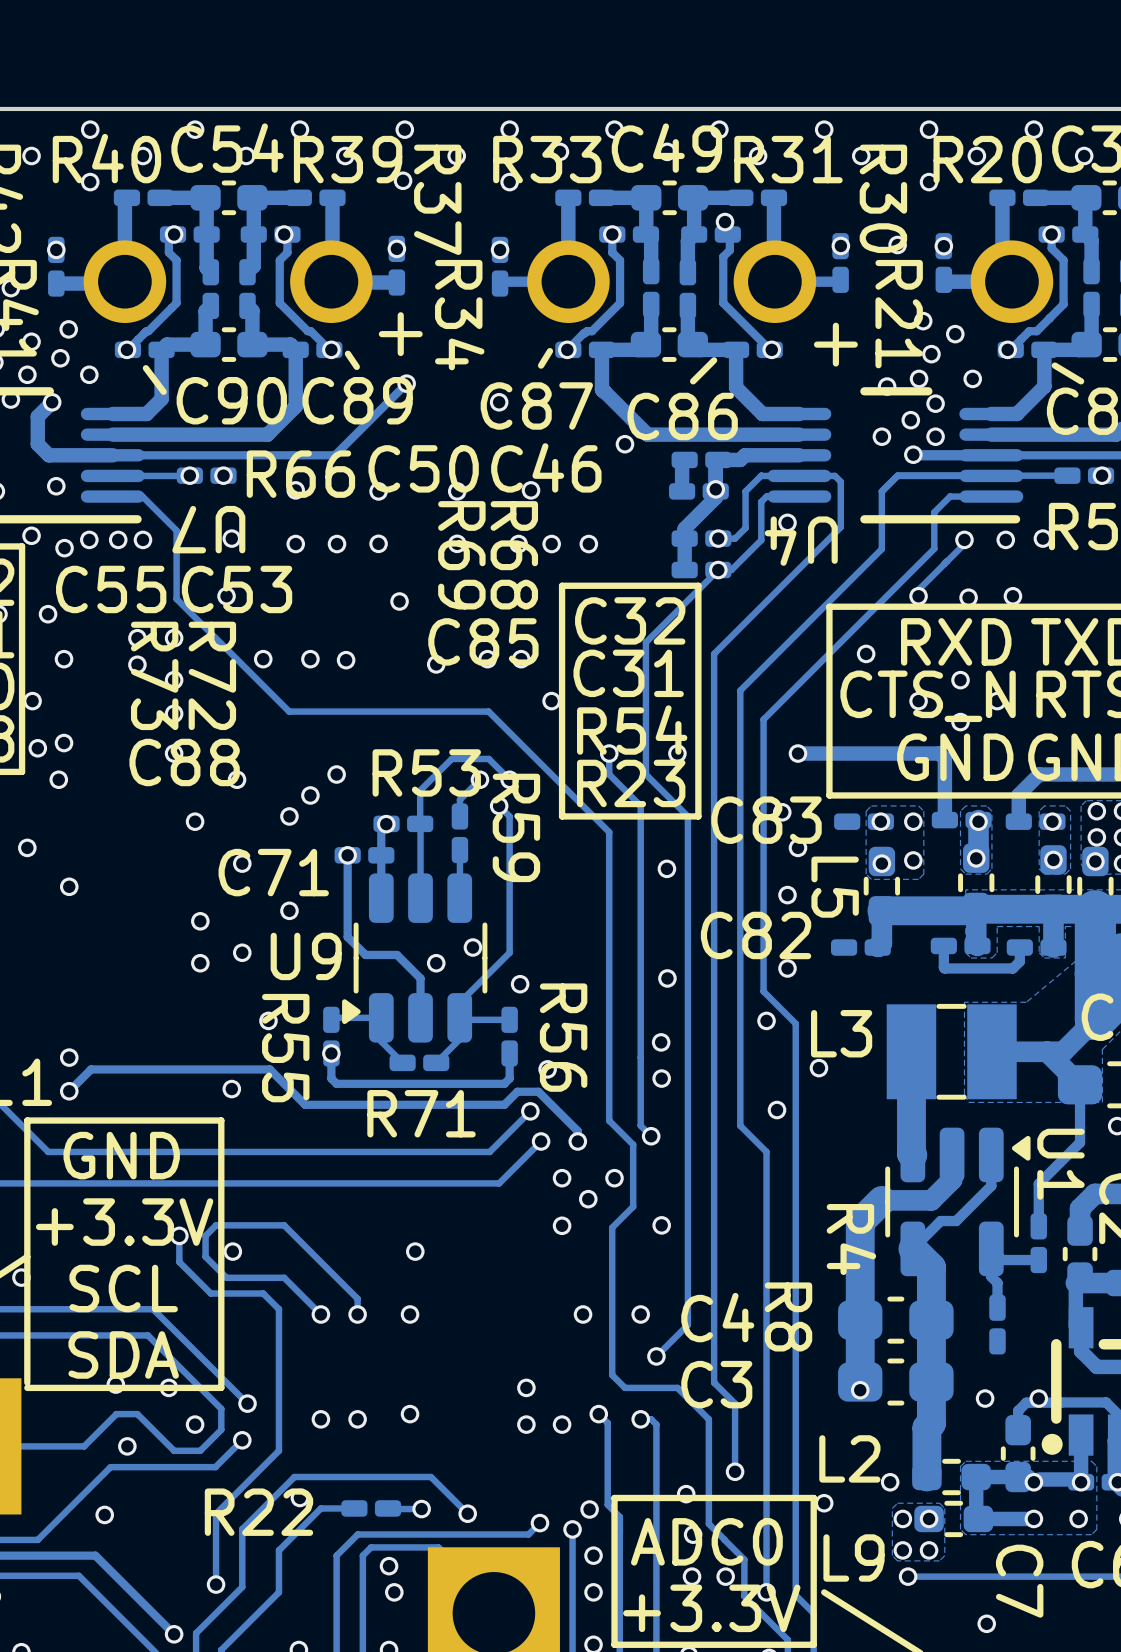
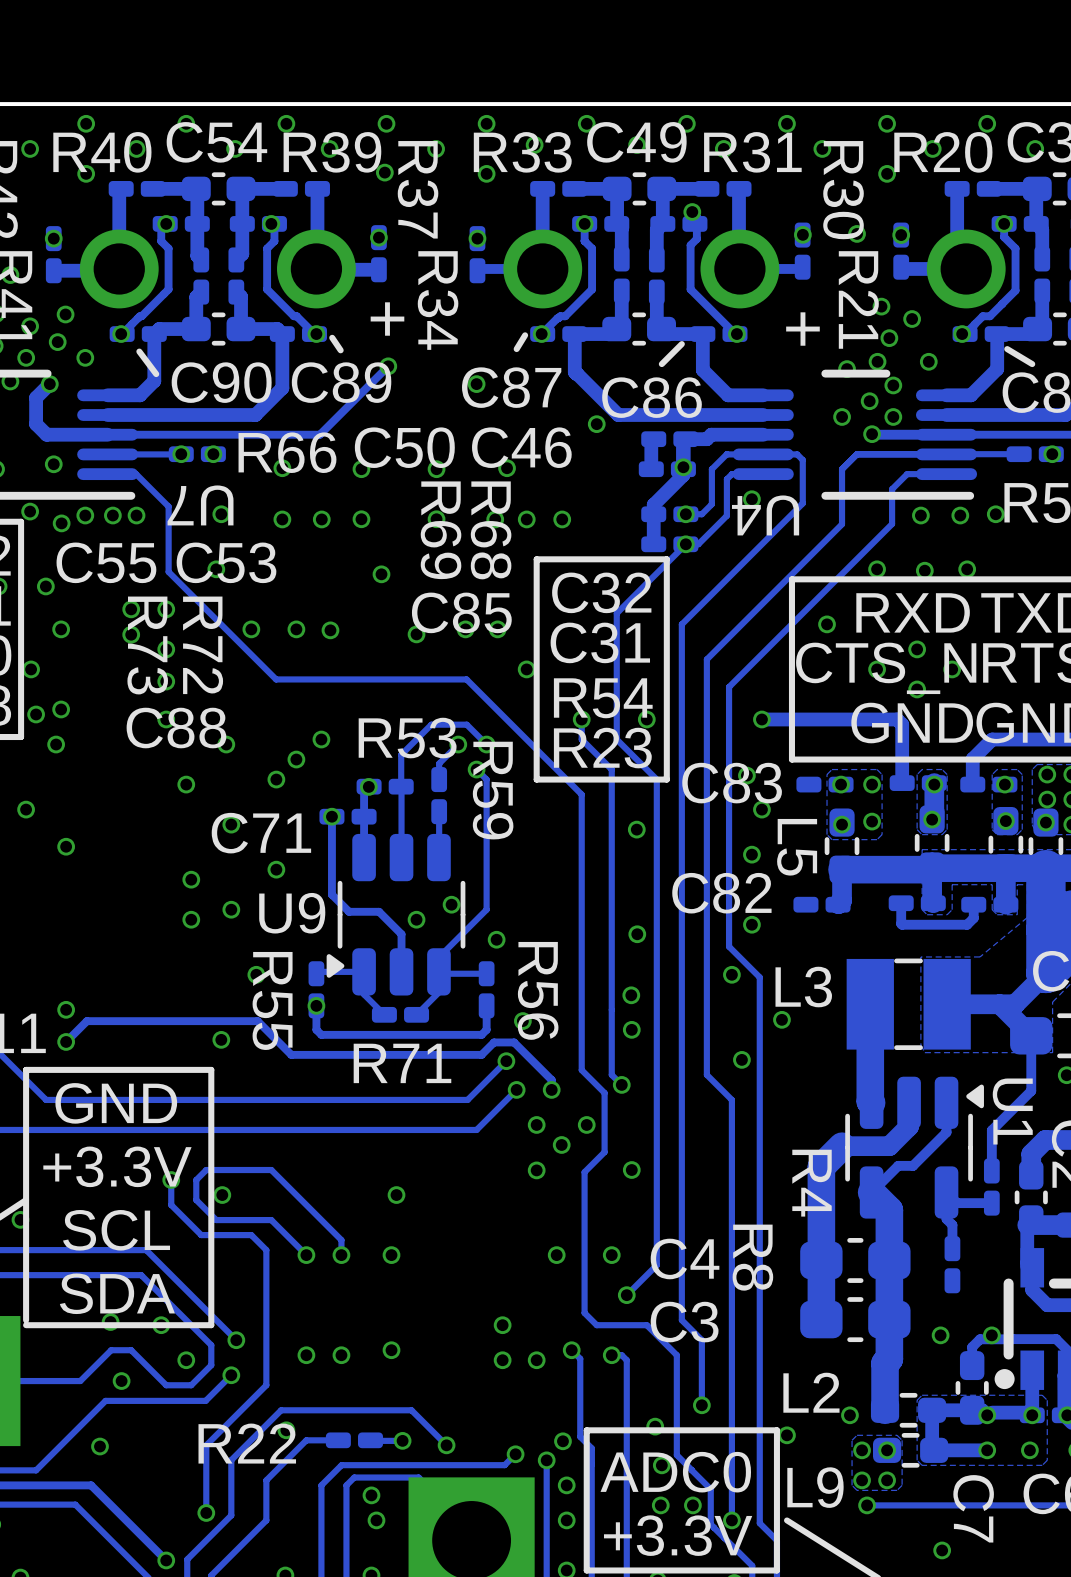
track: (964, 539) (964, 544) (947, 561) -> none
track: (944, 563) (918, 589) (918, 596) -> none
via: (860, 1390) -> none

